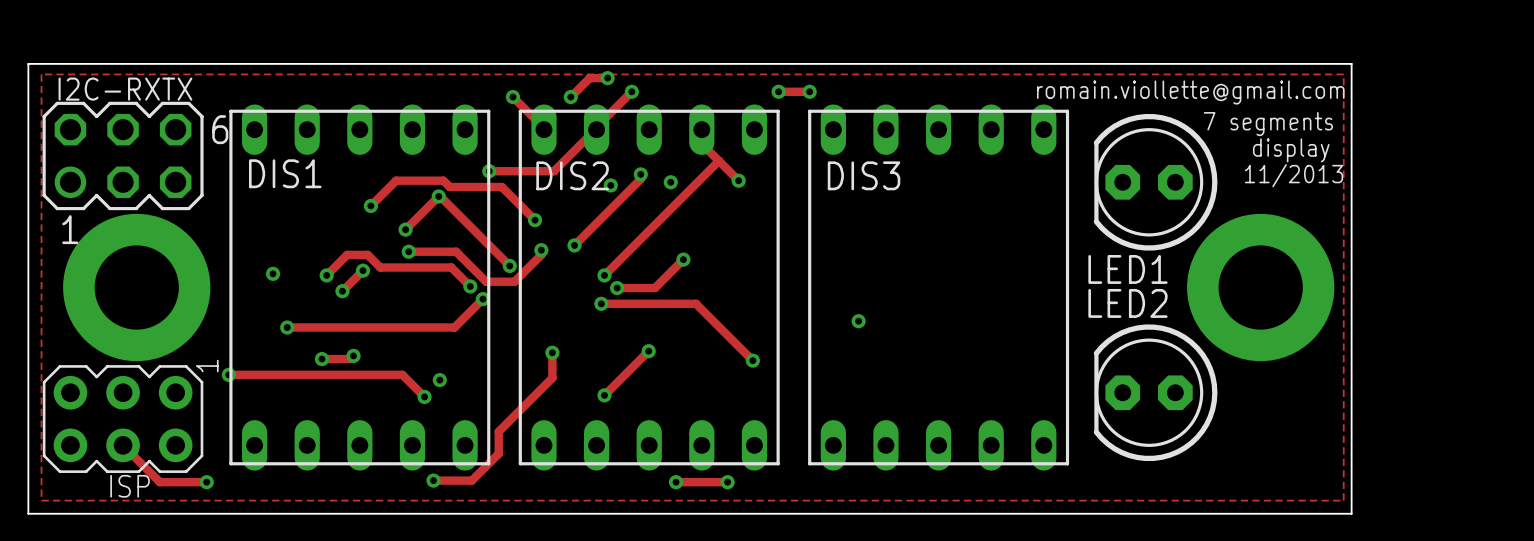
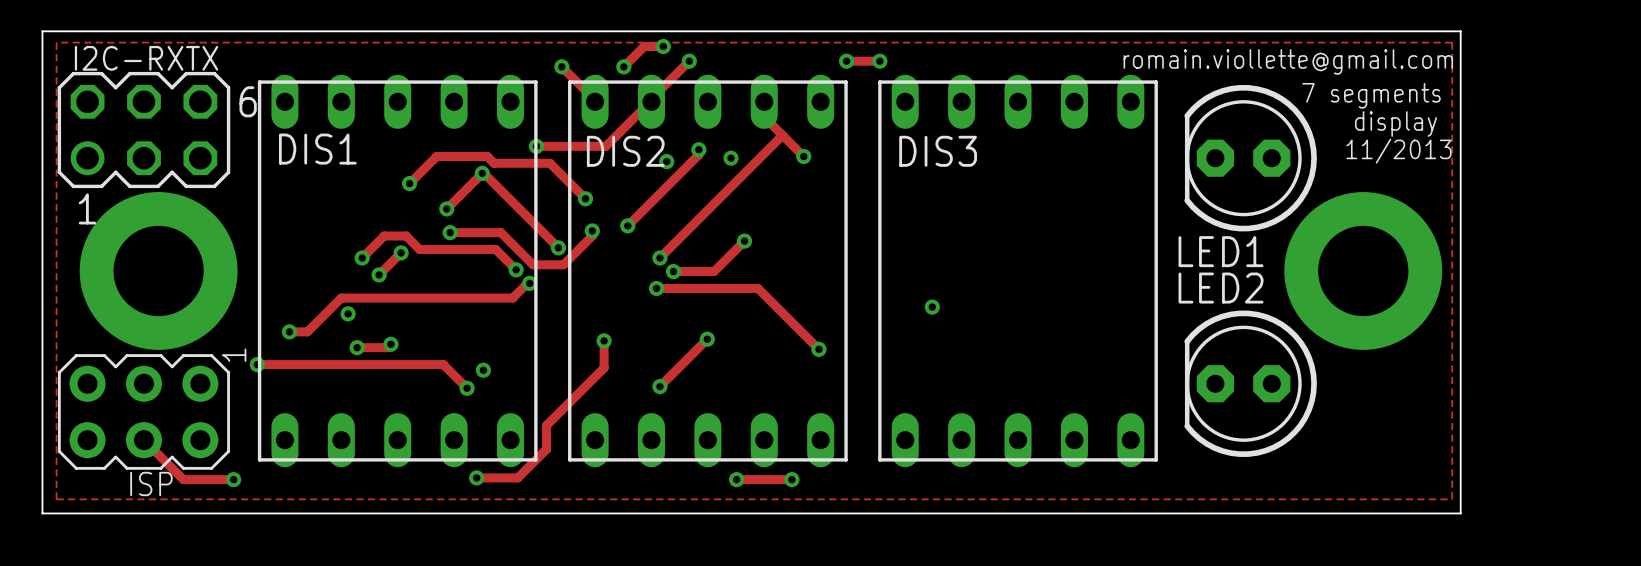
via: (273, 273) -> none
track: (482, 299) (454, 327) (287, 327) -> (529, 283) (512, 298) (341, 298) (307, 331) (289, 331)
via: (287, 327) -> none
via: none -> (348, 313)
via: none -> (289, 331)

